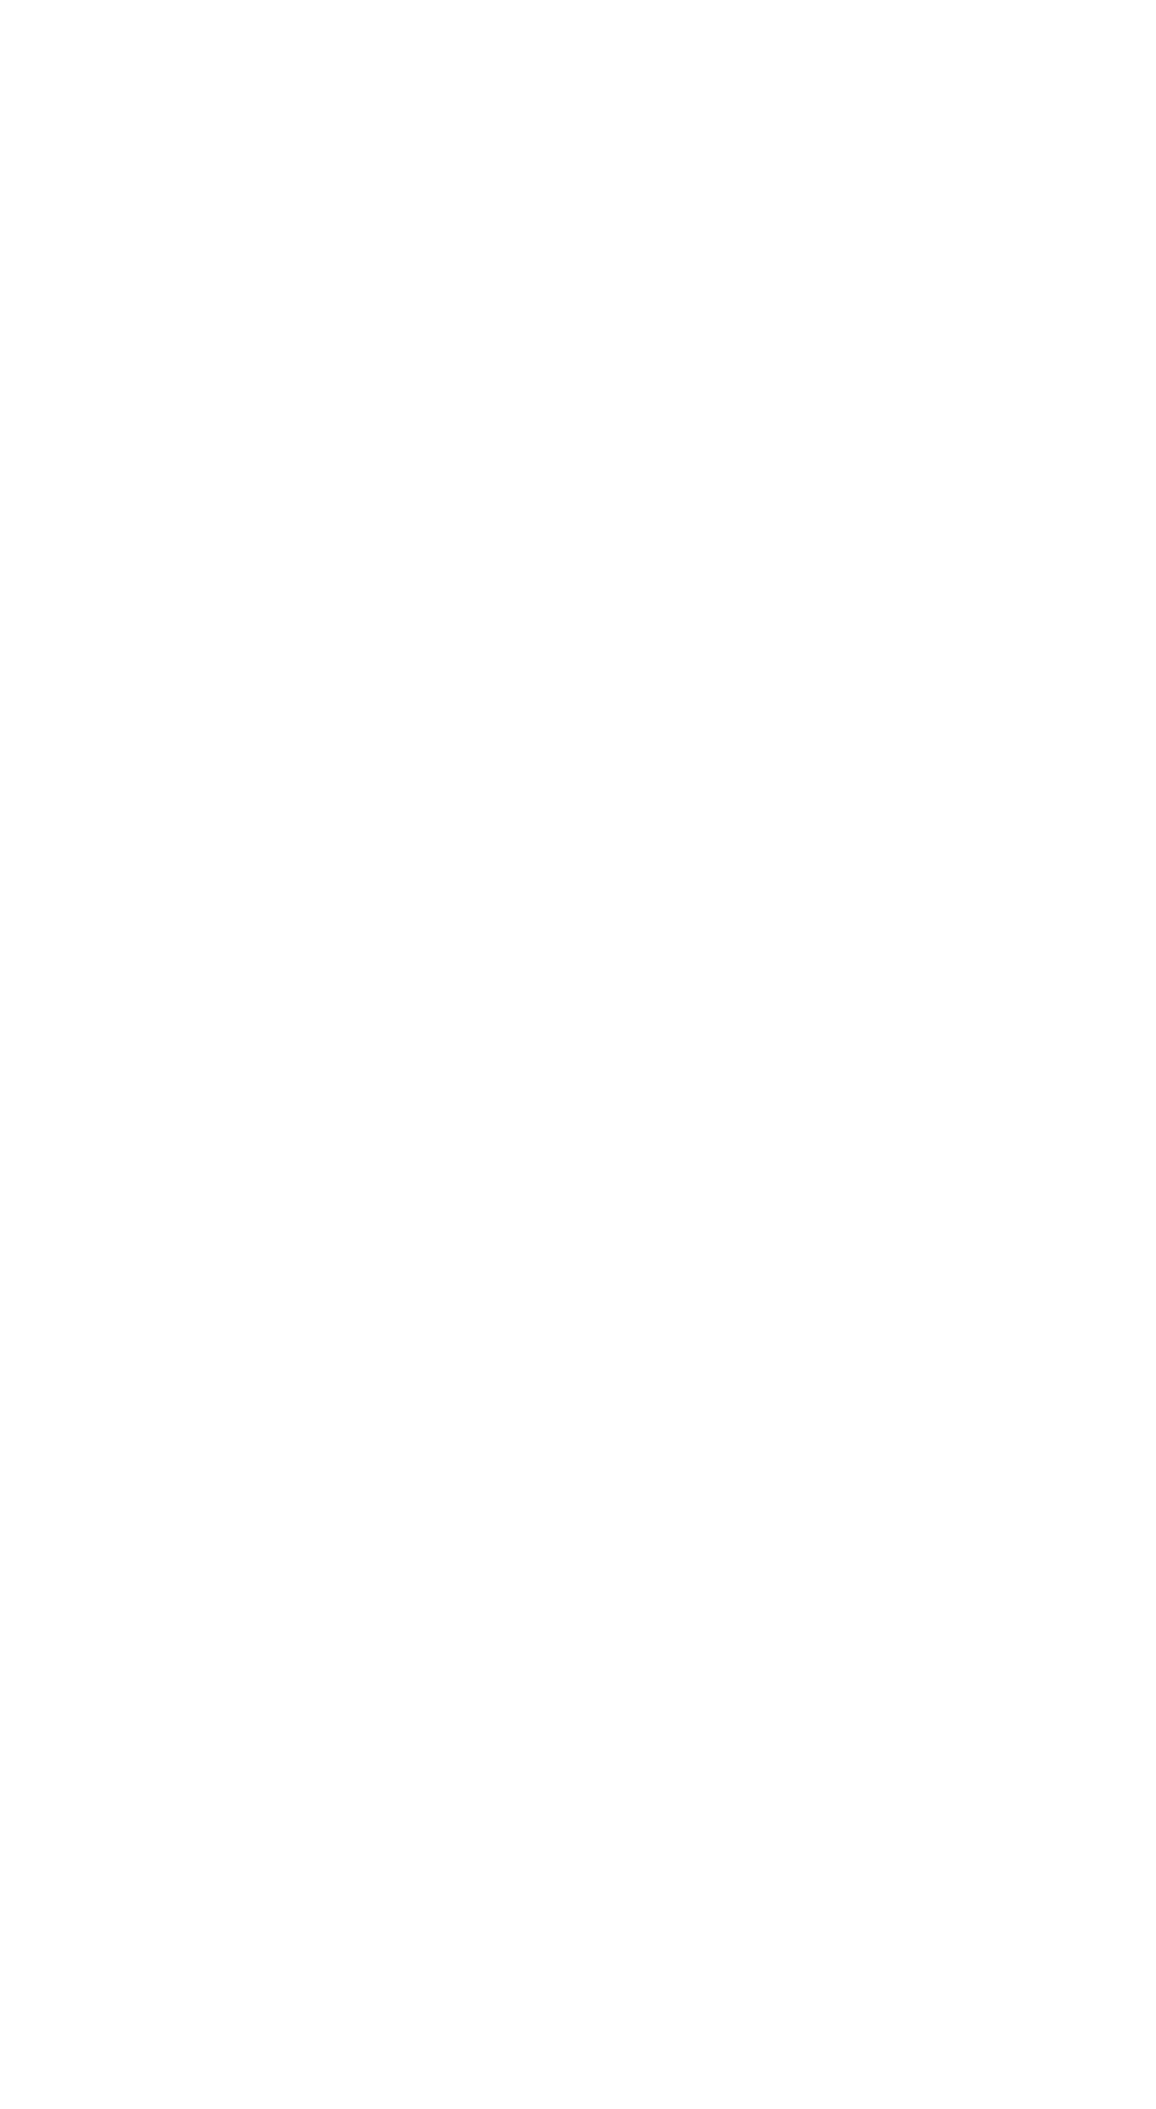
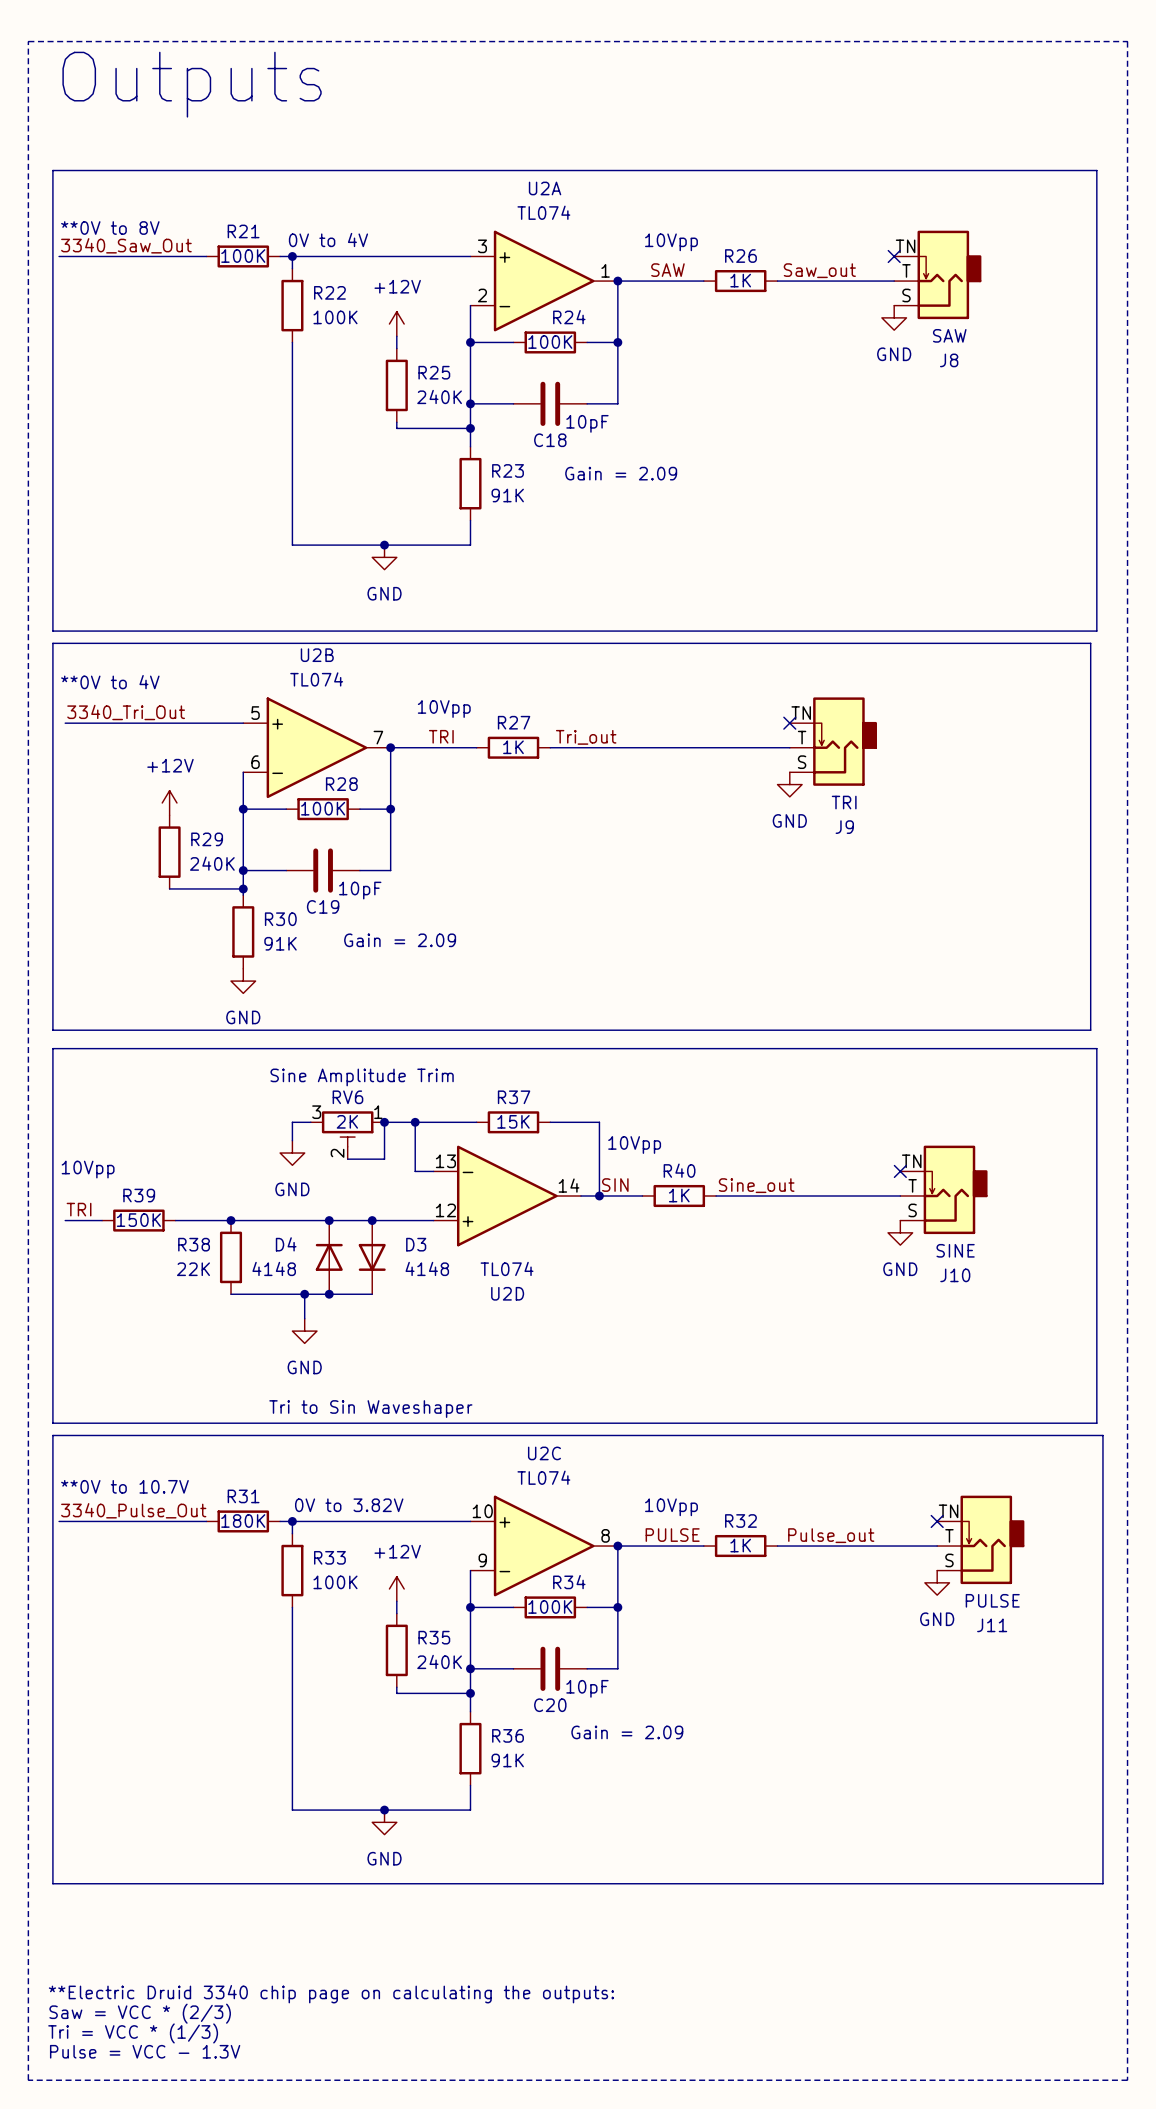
line: none -> (28, 41) (1127, 41) (1127, 2080) (28, 2080) (28, 41)
text: none -> Outputs (192, 84)
line: none -> (52, 170) (1096, 170) (1096, 631) (52, 631) (52, 170)
text: none -> **0V to 8V (110, 228)
text: none -> 0V to 4V (328, 239)
text: none -> 10Vpp (671, 242)
label: none -> 3340_Saw_Out (126, 245)
wire: none -> (59, 256) (206, 256)
R21: none -> 100K (243, 256)
wire: none -> (280, 256) (470, 256)
wire: none -> (292, 256) (292, 268)
junction: none -> (292, 256)
no-connect mark: none -> (894, 256)
label: none -> SAW (667, 270)
label: none -> Saw_out (819, 270)
J8: none -> SAW (937, 274)
U2A: none -> TL074 (544, 281)
junction: none -> (617, 281)
wire: none -> (703, 281) (617, 281) (617, 403) (587, 403)
R26: none -> 1K (740, 281)
wire: none -> (777, 281) (894, 281)
R22: none -> 100K (292, 305)
wire: none -> (470, 305) (470, 446)
power symbol: none -> GND (894, 317)
power symbol: none -> +12V (396, 324)
wire: none -> (396, 336) (396, 348)
wire: none -> (292, 342) (292, 545) (470, 545) (470, 520)
wire: none -> (470, 342) (513, 342)
junction: none -> (470, 342)
R24: none -> 100K (550, 342)
wire: none -> (587, 342) (617, 342)
junction: none -> (617, 342)
R25: none -> 240K (396, 385)
wire: none -> (470, 403) (513, 403)
junction: none -> (470, 403)
C18: none -> 10pF (550, 403)
wire: none -> (396, 422) (396, 428) (470, 428)
junction: none -> (470, 428)
text: none -> Gain = 2.09 (621, 473)
R23: none -> 91K (470, 483)
junction: none -> (384, 545)
power symbol: none -> GND (384, 557)
line: none -> (52, 643) (52, 1030) (1090, 1030) (1090, 643) (52, 643)
text: none -> **0V to 4V (110, 682)
text: none -> 10Vpp (444, 709)
label: none -> 3340_Tri_Out (126, 712)
wire: none -> (65, 723) (243, 723)
no-connect mark: none -> (789, 723)
label: none -> TRI (441, 736)
label: none -> Tri_out (586, 737)
J9: none -> TRI (833, 741)
U2B: none -> TL074 (316, 747)
junction: none -> (390, 747)
wire: none -> (476, 747) (390, 747) (390, 870) (359, 870)
R27: none -> 1K (513, 747)
wire: none -> (550, 747) (789, 747)
wire: none -> (243, 772) (243, 895)
power symbol: none -> GND (789, 784)
power symbol: none -> +12V (169, 803)
wire: none -> (243, 809) (286, 809)
junction: none -> (243, 809)
R28: none -> 100K (323, 809)
wire: none -> (359, 809) (390, 809)
junction: none -> (390, 809)
R29: none -> 240K (169, 852)
wire: none -> (243, 870) (286, 870)
junction: none -> (243, 870)
C19: none -> 10pF (323, 870)
wire: none -> (169, 888) (243, 888)
junction: none -> (243, 888)
R30: none -> 91K (243, 931)
text: none -> Gain = 2.09 (400, 940)
power symbol: none -> GND (243, 981)
line: none -> (52, 1048) (52, 1423) (1096, 1423) (1096, 1048) (52, 1048)
text: none -> Sine Amplitude Trim (362, 1077)
wire: none -> (310, 1122) (292, 1122) (292, 1140)
junction: none -> (384, 1122)
wire: none -> (415, 1122) (415, 1171) (433, 1171)
junction: none -> (415, 1122)
wire: none -> (476, 1122) (384, 1122) (384, 1159) (347, 1159)
R37: none -> 15K (513, 1122)
wire: none -> (550, 1122) (599, 1122) (599, 1196)
RV6: none -> 2K (347, 1135)
text: none -> 10Vpp (634, 1145)
power symbol: none -> GND (292, 1153)
text: none -> 10Vpp (88, 1169)
no-connect mark: none -> (900, 1171)
label: none -> SIN (615, 1185)
label: none -> Sine_out (756, 1185)
J10: none -> SINE (943, 1189)
U2D: none -> TL074 (507, 1196)
wire: none -> (581, 1196) (642, 1196)
junction: none -> (599, 1196)
R40: none -> 1K (679, 1196)
wire: none -> (716, 1196) (900, 1196)
label: none -> TRI (79, 1209)
wire: none -> (65, 1220) (102, 1220)
R39: none -> 150K (138, 1220)
wire: none -> (175, 1220) (433, 1220)
junction: none -> (231, 1220)
junction: none -> (329, 1220)
junction: none -> (372, 1220)
power symbol: none -> GND (900, 1232)
R38: none -> 22K (231, 1257)
D4: none -> 4148 (329, 1257)
D3: none -> 4148 (372, 1257)
wire: none -> (231, 1294) (372, 1294)
wire: none -> (304, 1294) (304, 1318)
junction: none -> (304, 1294)
junction: none -> (329, 1294)
power symbol: none -> GND (304, 1331)
text: none -> Tri to Sin Waveshaper (370, 1409)
line: none -> (52, 1435) (52, 1883) (1102, 1883) (1102, 1435) (52, 1435)
text: none -> **0V to 10.7V (124, 1486)
text: none -> 0V to 3.82V (349, 1505)
text: none -> 10Vpp (671, 1507)
label: none -> 3340_Pulse_Out (133, 1510)
wire: none -> (59, 1521) (206, 1521)
R31: none -> 180K (243, 1521)
wire: none -> (280, 1521) (470, 1521)
wire: none -> (292, 1521) (292, 1533)
junction: none -> (292, 1521)
no-connect mark: none -> (937, 1521)
label: none -> PULSE (672, 1535)
label: none -> Pulse_out (831, 1535)
J11: none -> PULSE (980, 1539)
U2C: none -> TL074 (544, 1546)
junction: none -> (617, 1546)
wire: none -> (703, 1546) (617, 1546) (617, 1668) (587, 1668)
R32: none -> 1K (740, 1546)
wire: none -> (777, 1546) (937, 1546)
R33: none -> 100K (292, 1570)
wire: none -> (470, 1570) (470, 1711)
power symbol: none -> GND (937, 1582)
power symbol: none -> +12V (396, 1589)
wire: none -> (396, 1601) (396, 1613)
wire: none -> (292, 1607) (292, 1810) (470, 1810) (470, 1785)
wire: none -> (470, 1607) (513, 1607)
junction: none -> (470, 1607)
R34: none -> 100K (550, 1607)
wire: none -> (587, 1607) (617, 1607)
junction: none -> (617, 1607)
R35: none -> 240K (396, 1650)
wire: none -> (470, 1668) (513, 1668)
junction: none -> (470, 1668)
C20: none -> 10pF (550, 1668)
wire: none -> (396, 1687) (396, 1693) (470, 1693)
junction: none -> (470, 1693)
text: none -> Gain = 2.09 (627, 1732)
R36: none -> 91K (470, 1748)
junction: none -> (384, 1810)
power symbol: none -> GND (384, 1822)
text: none -> **Electric Druid 3340 chip page on calculating the outputs: (331, 1994)
text: none -> Saw = VCC * (2/3) (140, 2013)
text: none -> Tri = VCC * (1/3) (133, 2033)
text: none -> Pulse = VCC - 1.3V (145, 2051)

